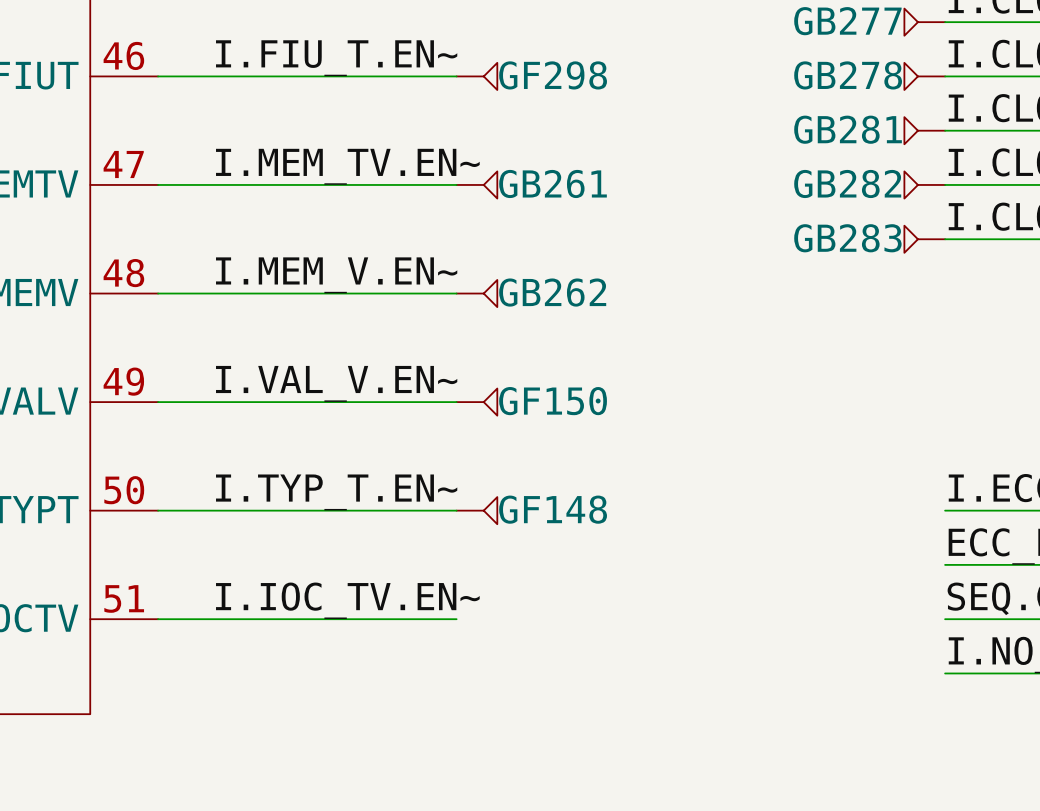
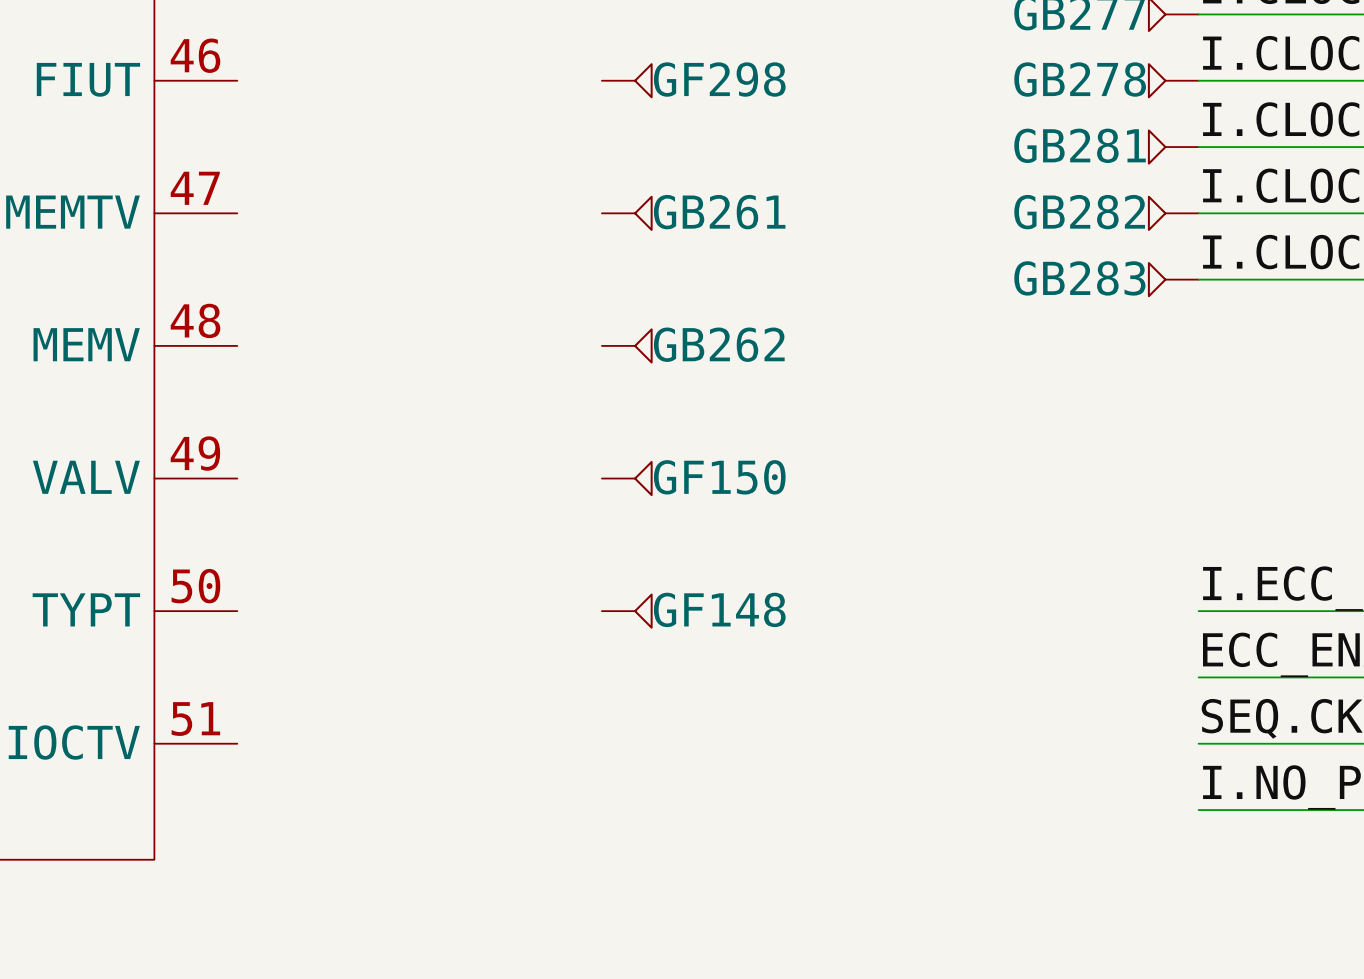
label: I.FIU_T.EN~ (336, 58) -> none
wire: (158, 76) (456, 76) -> none
label: I.MEM_TV.EN~ (347, 166) -> none
wire: (158, 184) (456, 184) -> none
label: I.MEM_V.EN~ (336, 275) -> none
wire: (158, 293) (456, 293) -> none
label: I.VAL_V.EN~ (336, 383) -> none
wire: (158, 402) (456, 402) -> none
label: I.TYP_T.EN~ (336, 492) -> none
wire: (158, 510) (456, 510) -> none
label: I.IOC_TV.EN~ (347, 600) -> none
wire: (158, 619) (456, 619) -> none

